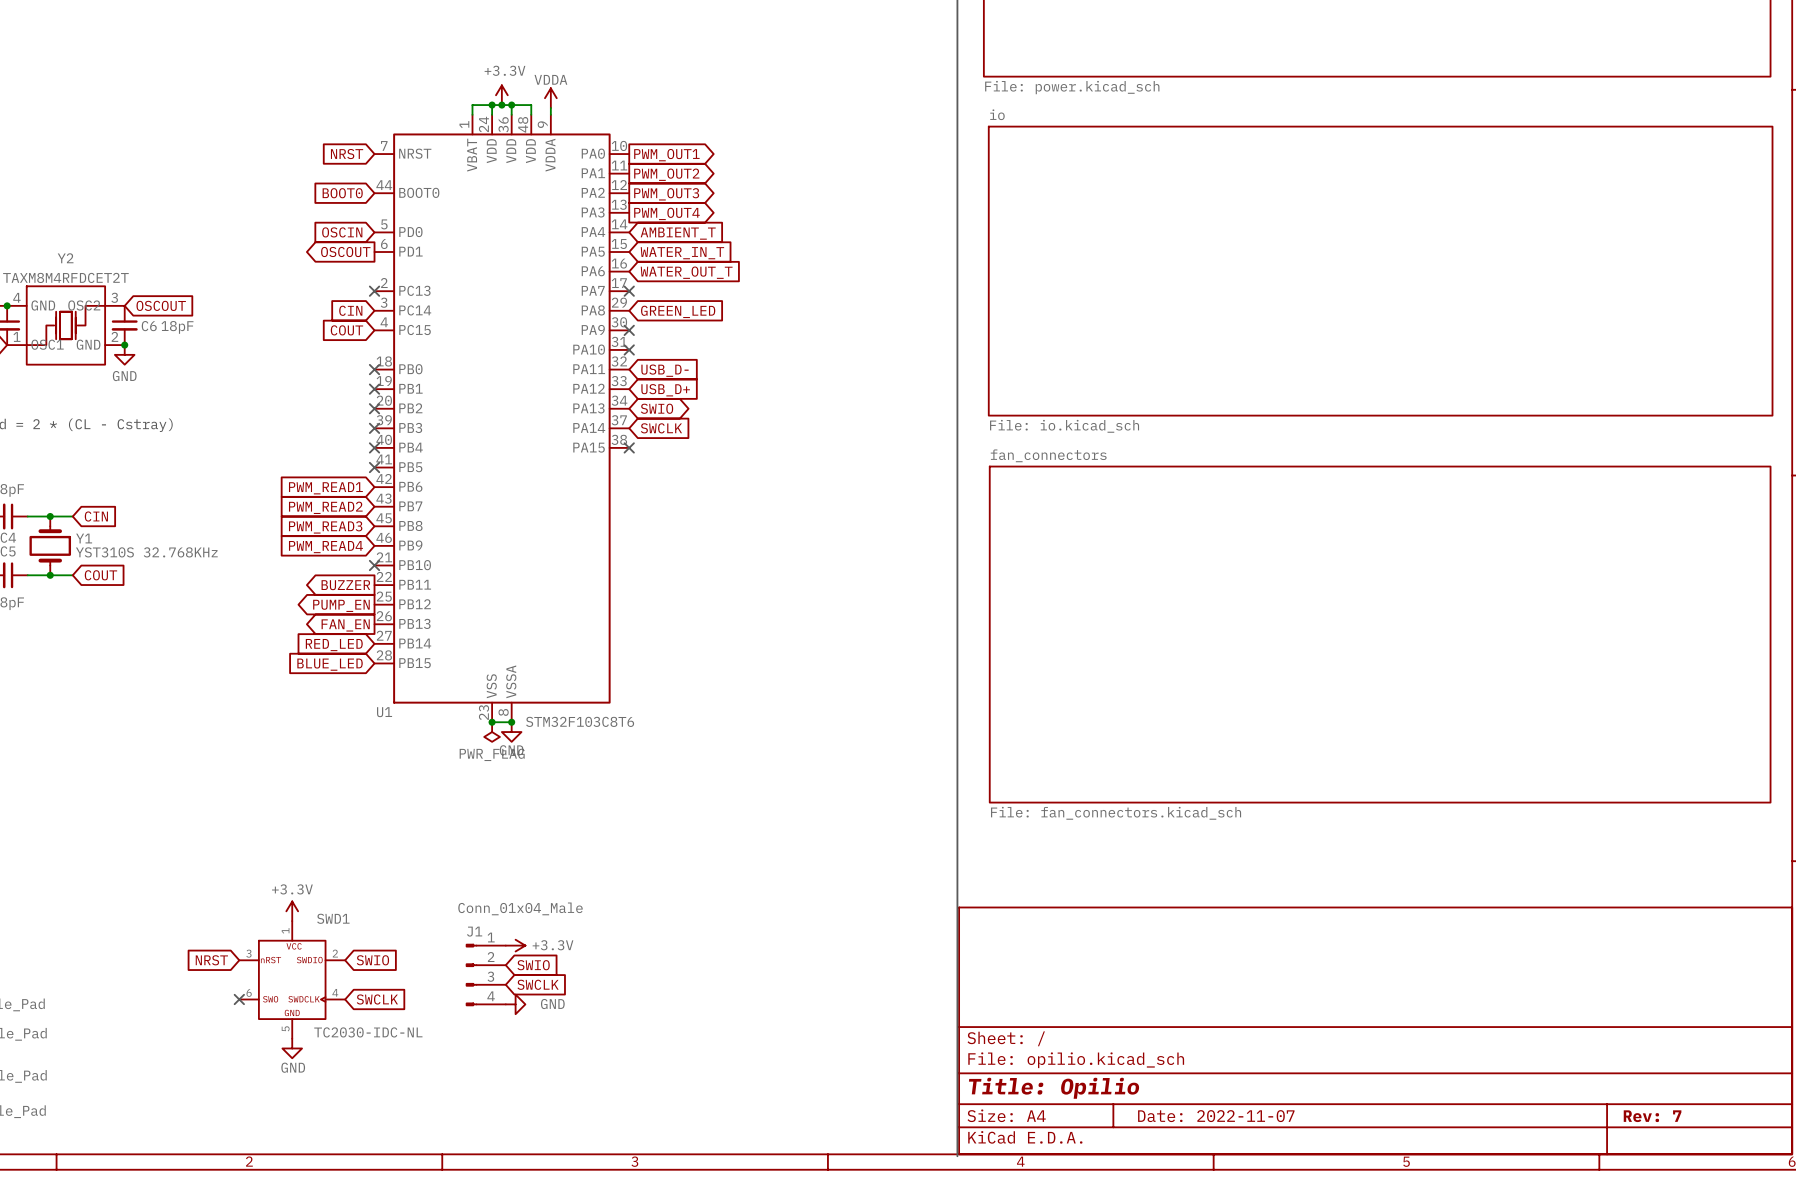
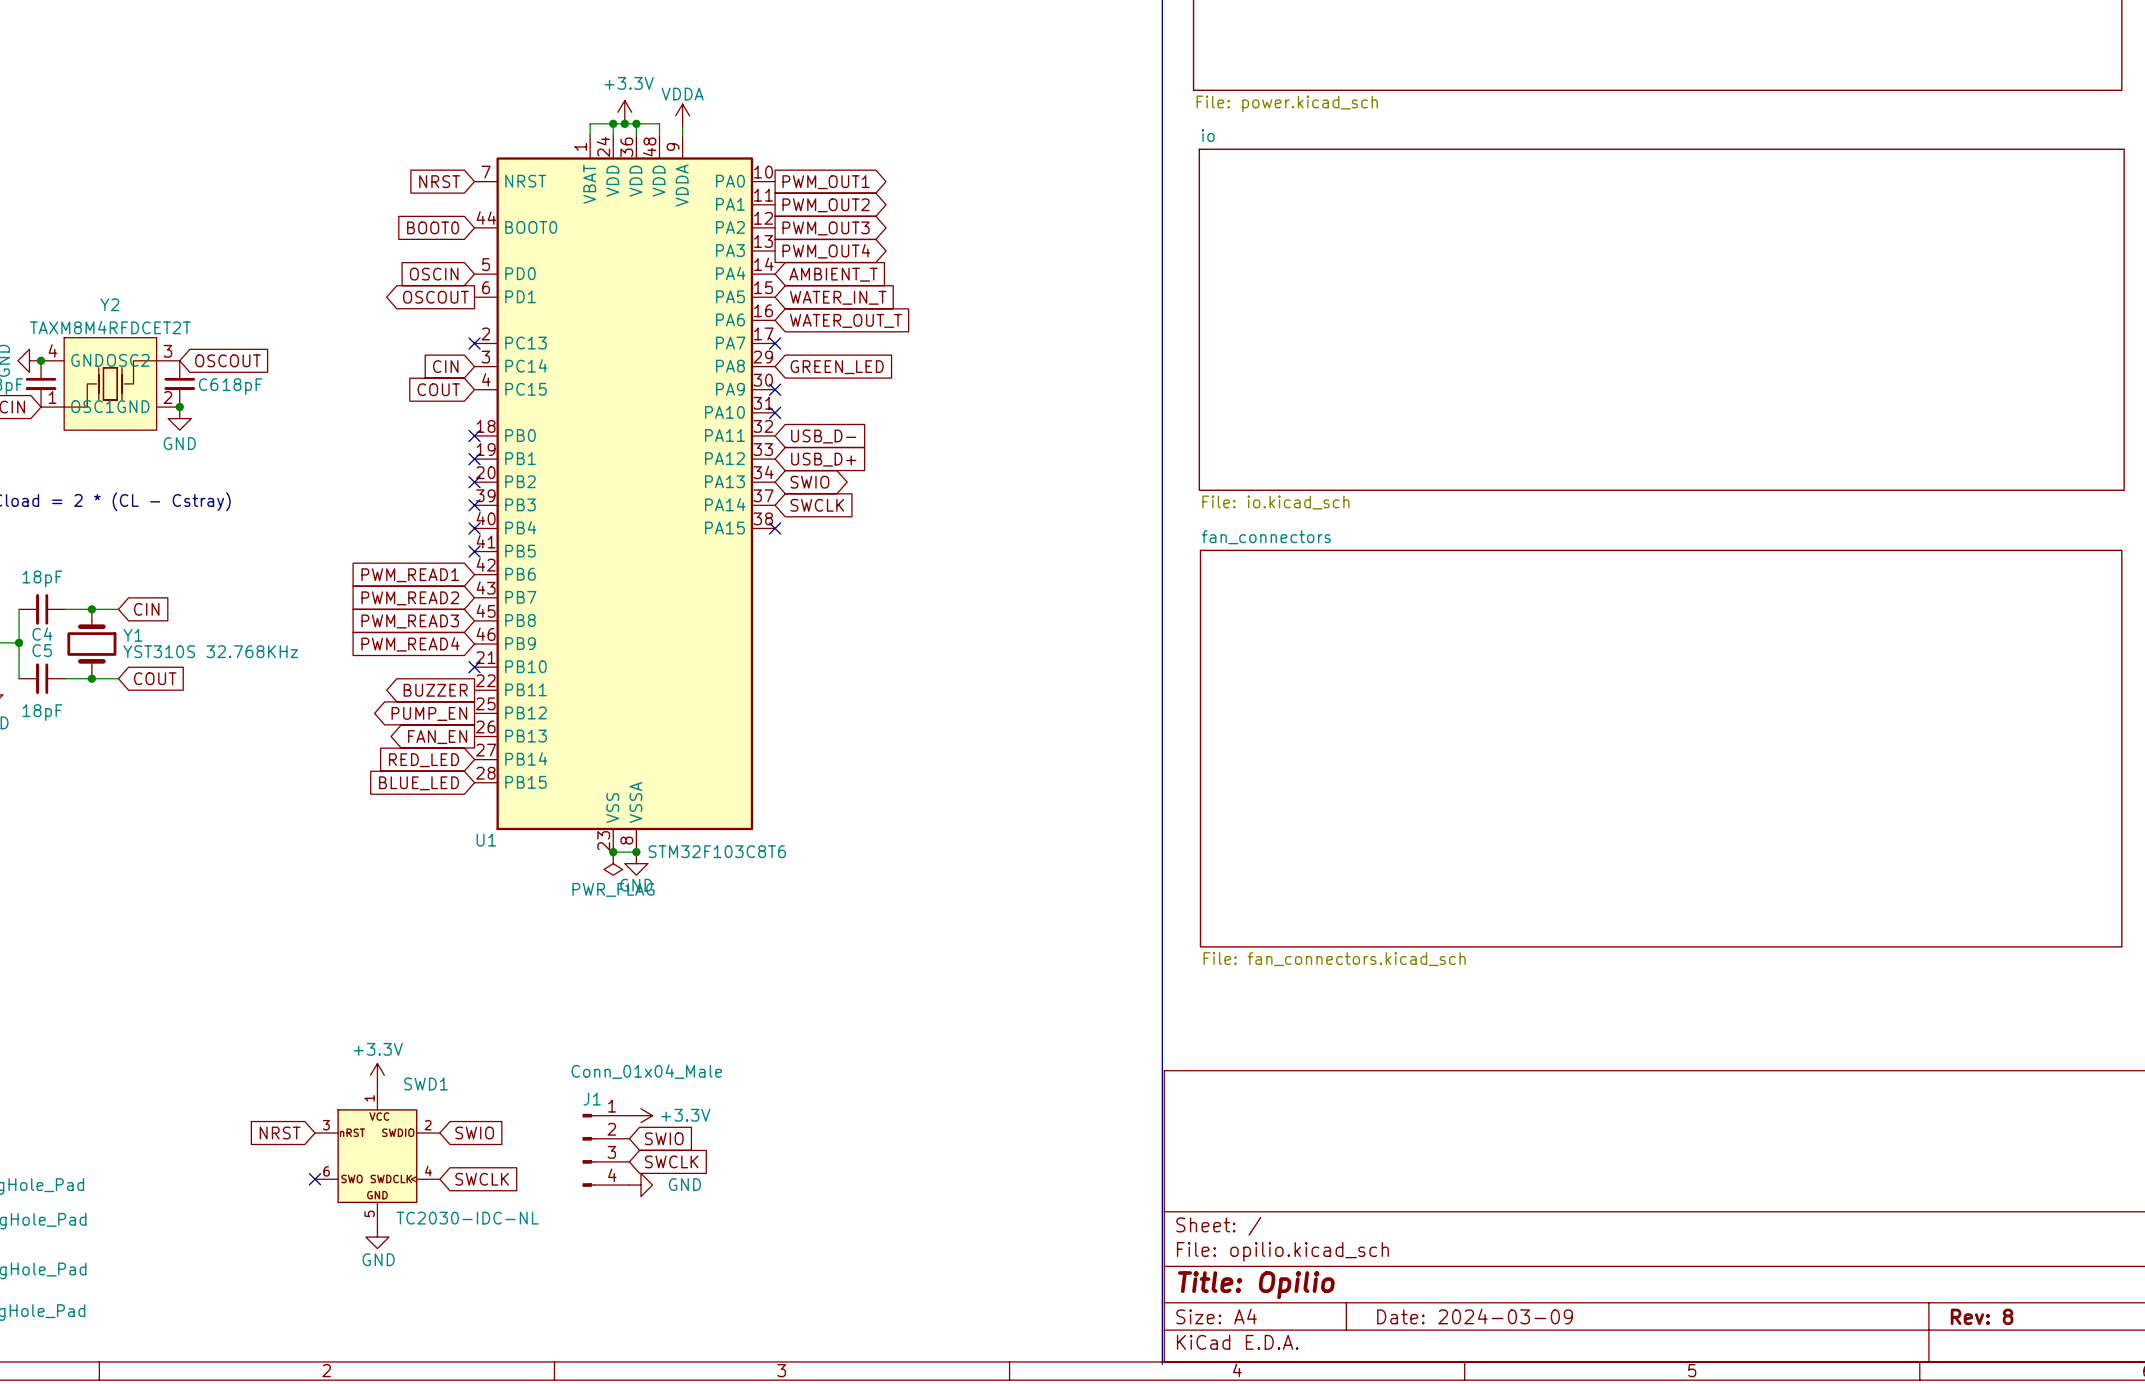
title block: Date: 2022-11-07 (1216, 1116) -> Date: 2024-03-09 (1475, 1316)
title block: Rev: 7 (1652, 1116) -> Rev: 8 (1982, 1316)

